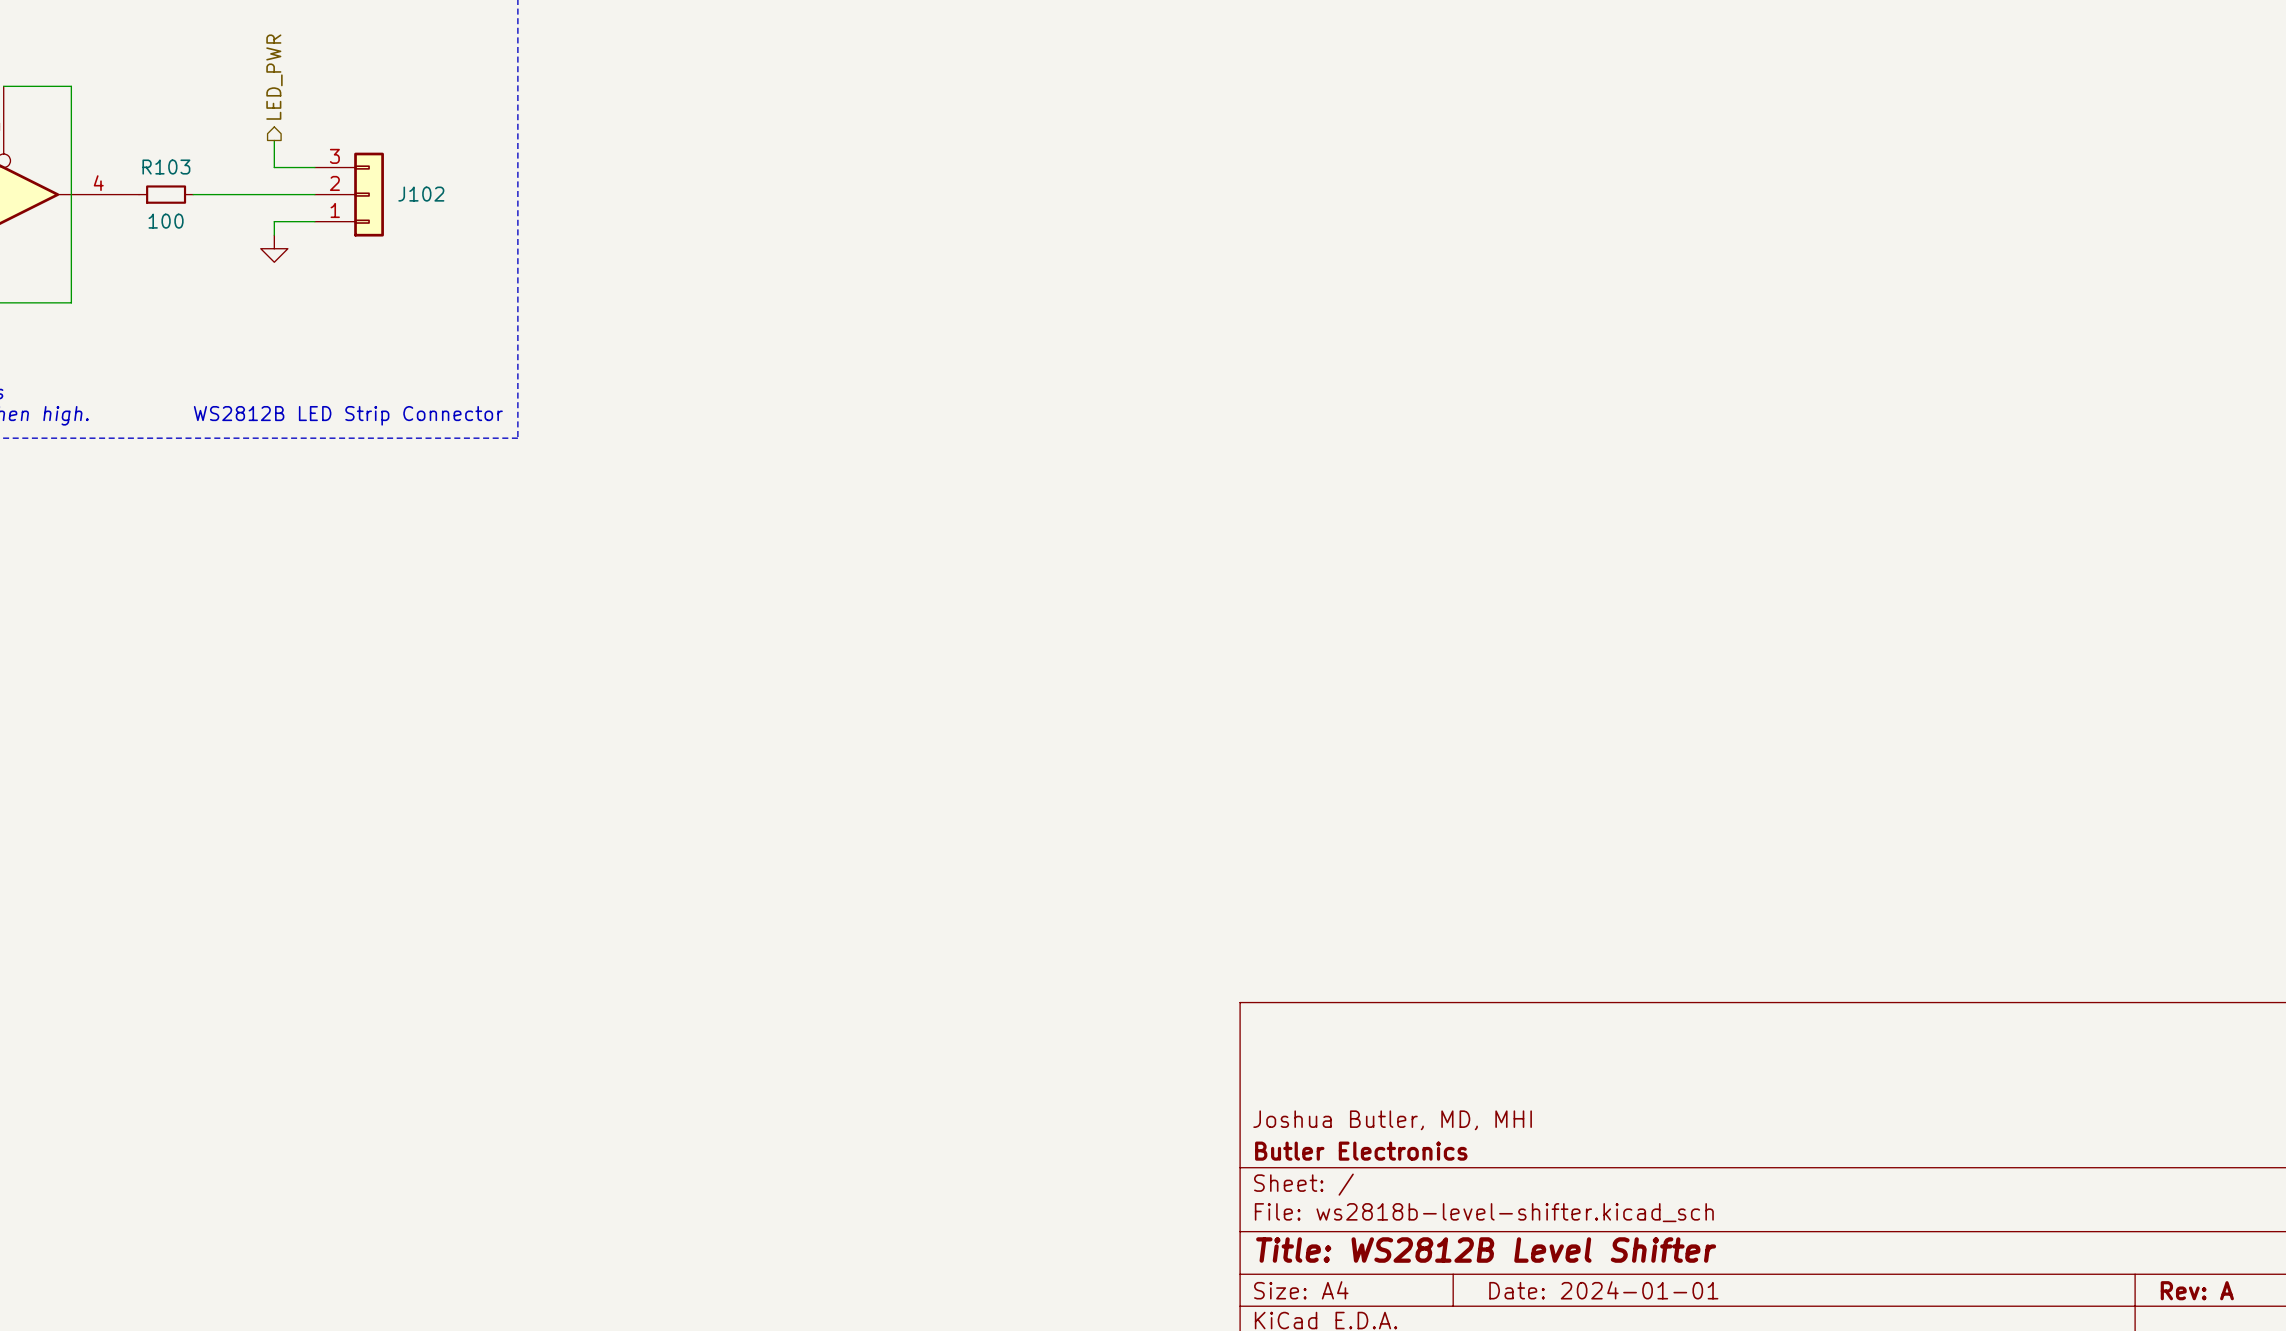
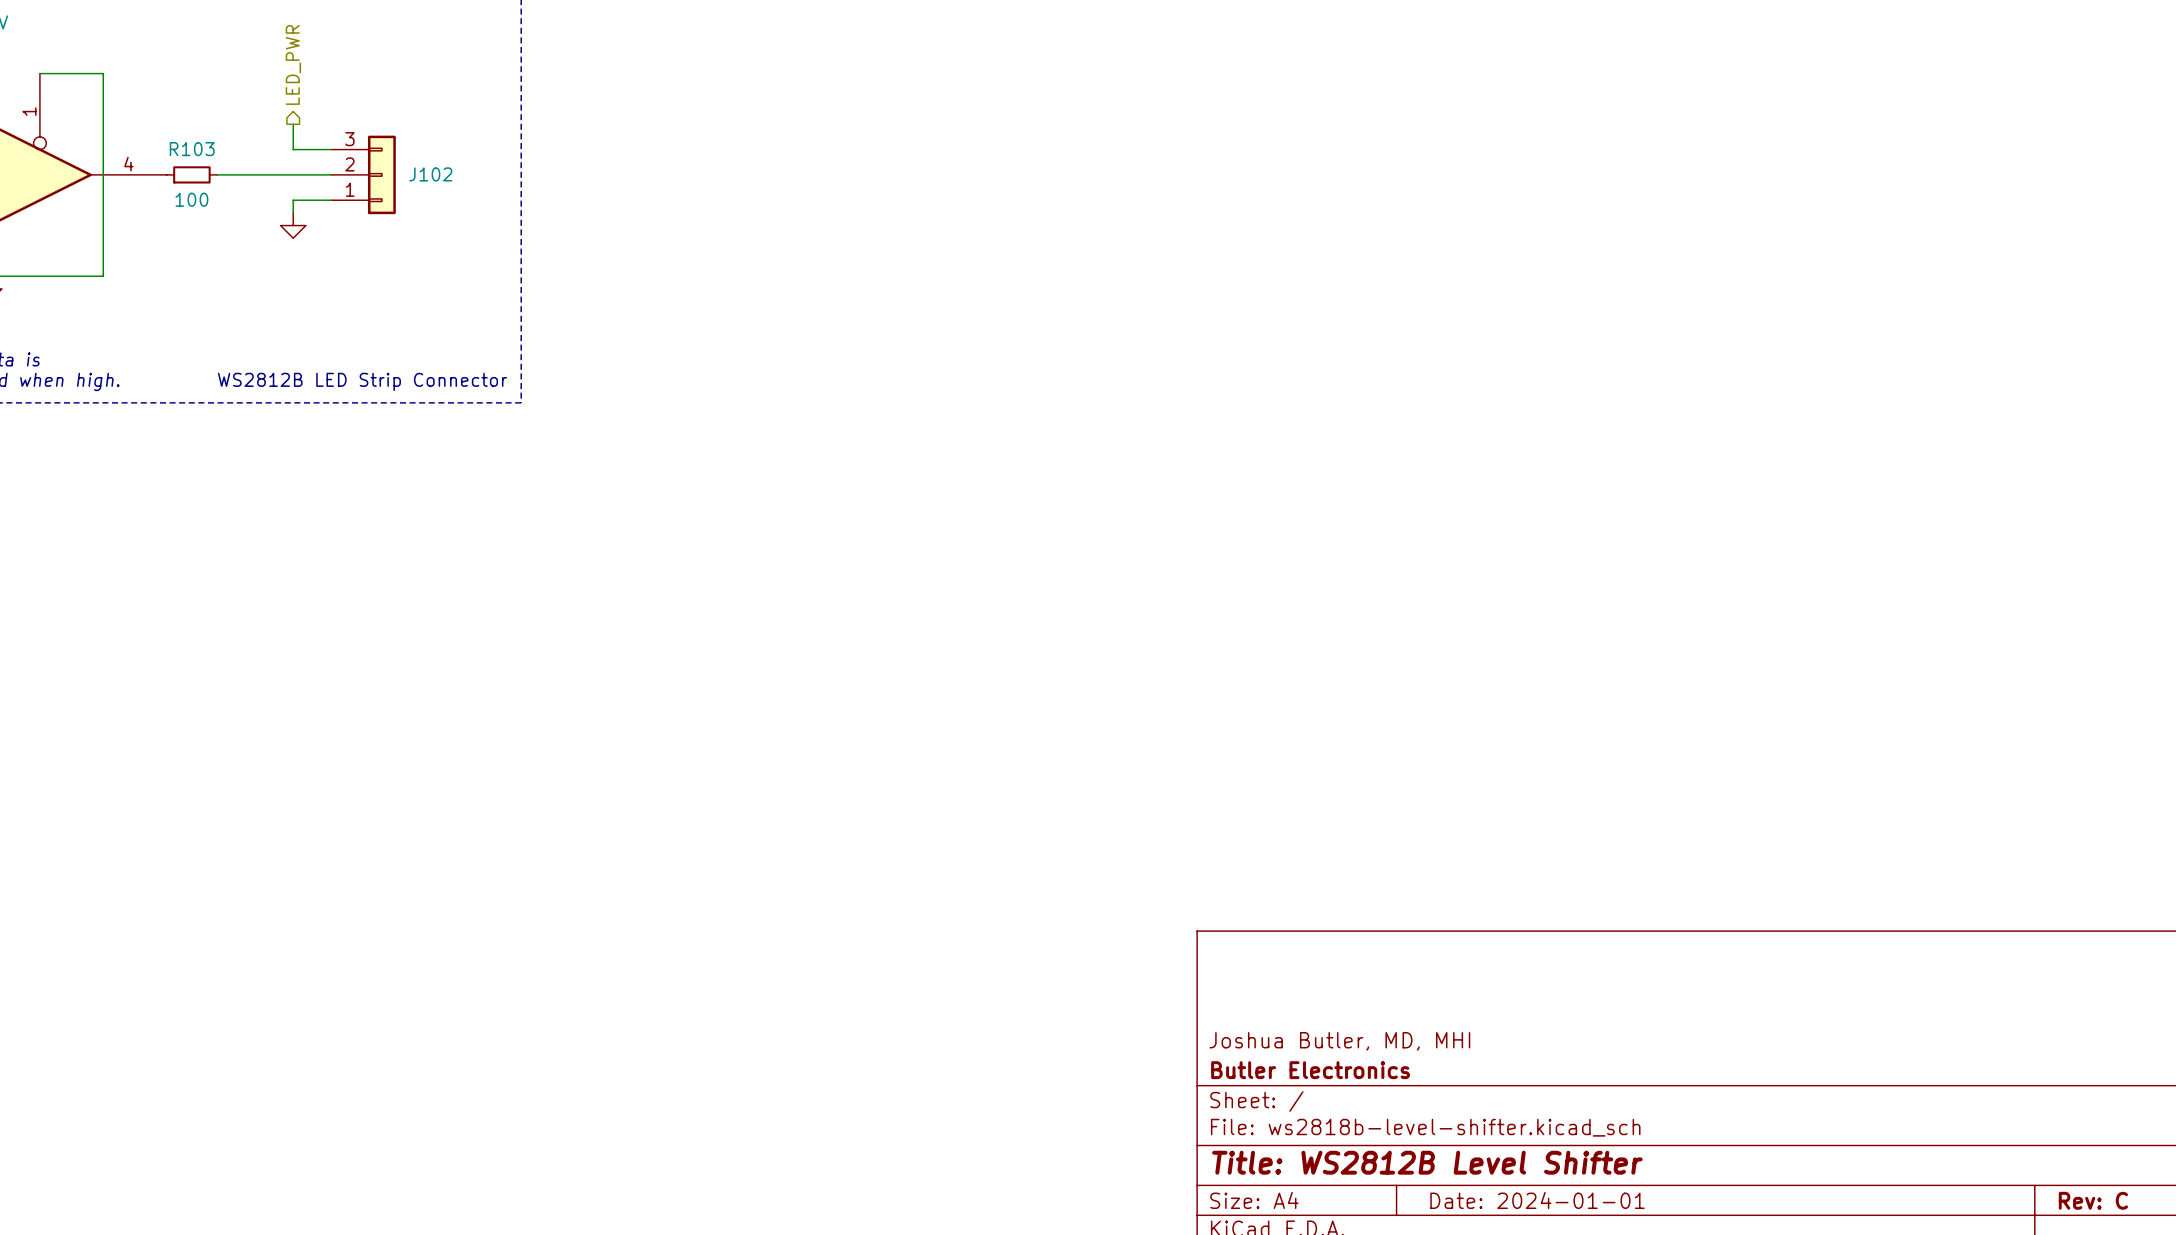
title block: Rev: A (2197, 1290) -> Rev: C (2093, 1200)

